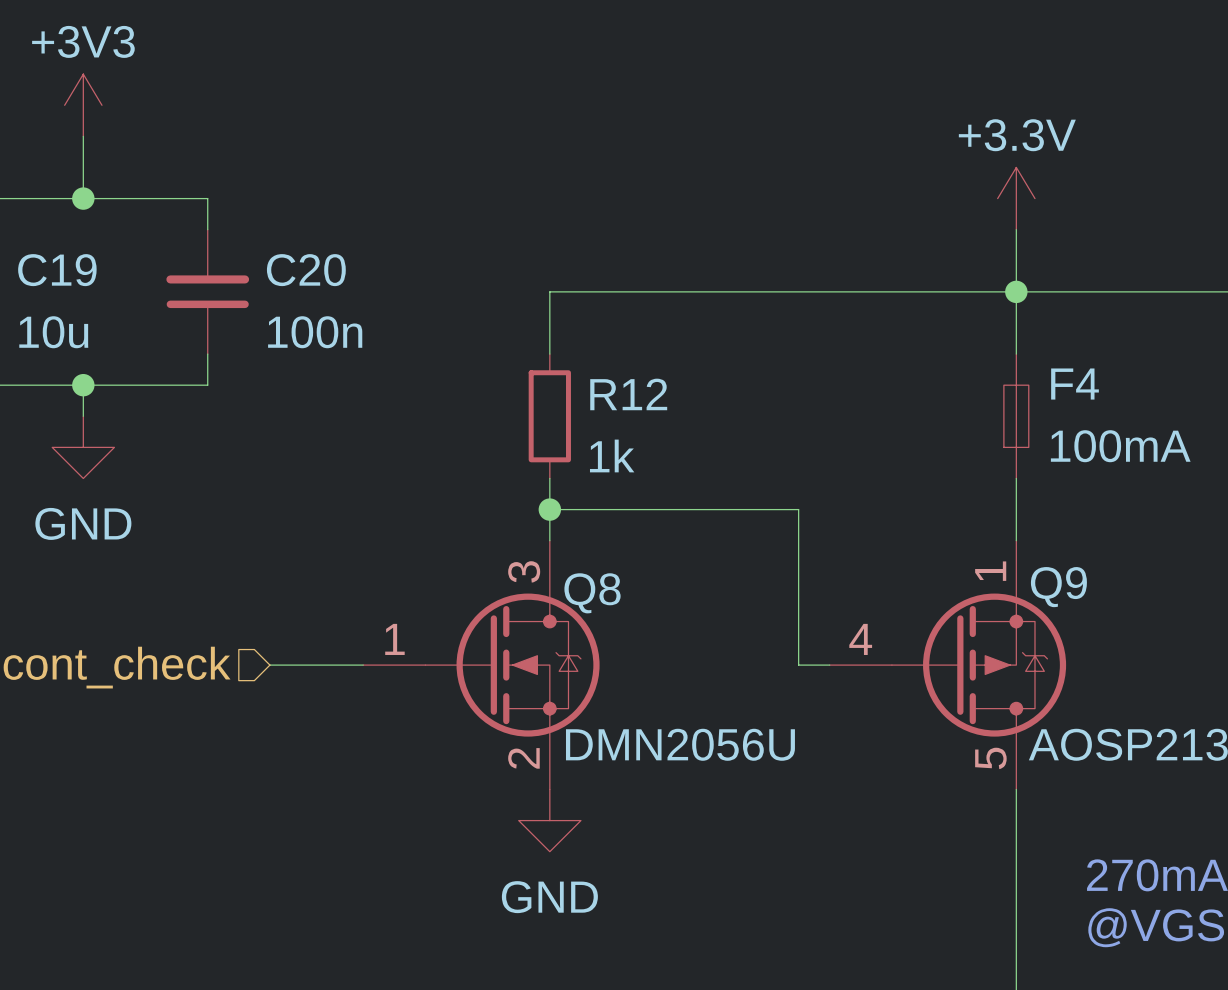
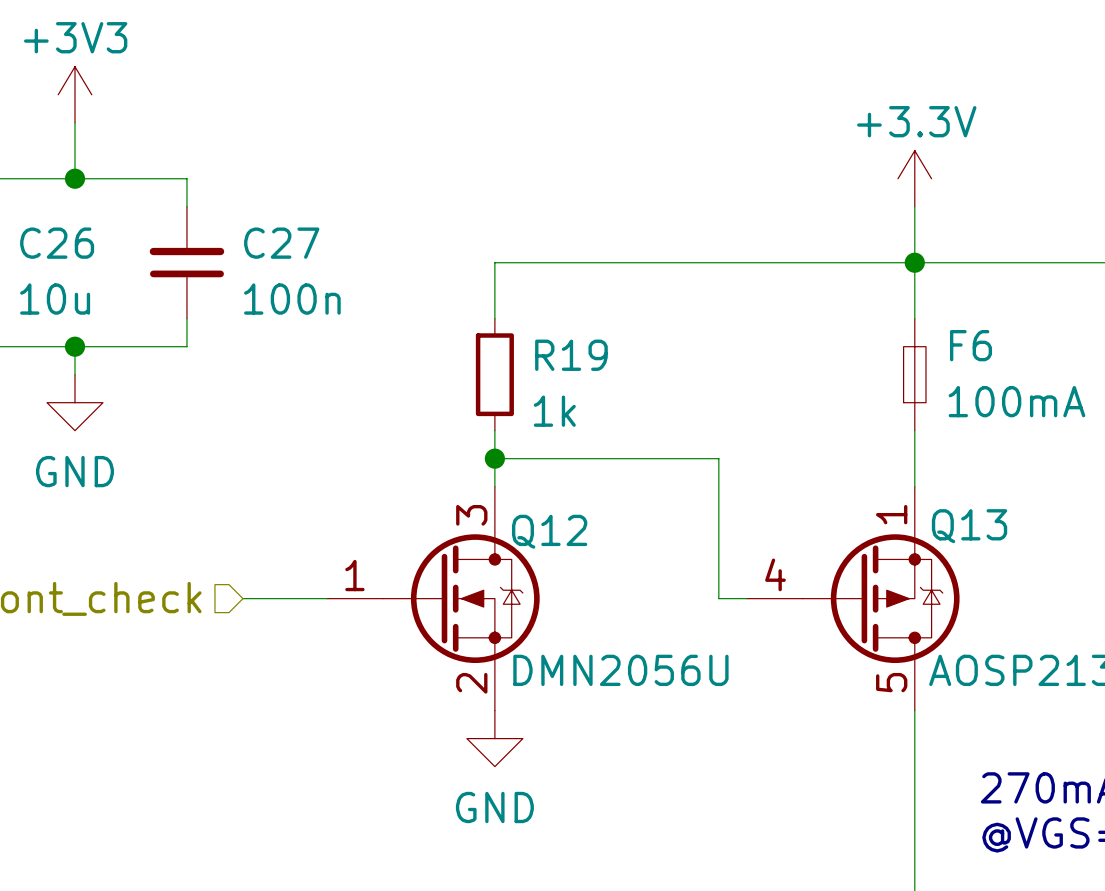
C19 name: C19 (57, 270) -> C26 (57, 243)
C20 name: C20 (306, 270) -> C27 (281, 243)
F4 name: F4 (1075, 384) -> F6 (970, 345)
R12 name: R12 (628, 394) -> R19 (571, 355)
Q9 name: Q9 (1058, 587) -> Q13 (969, 526)
Q8 name: Q8 (592, 593) -> Q12 (549, 531)

